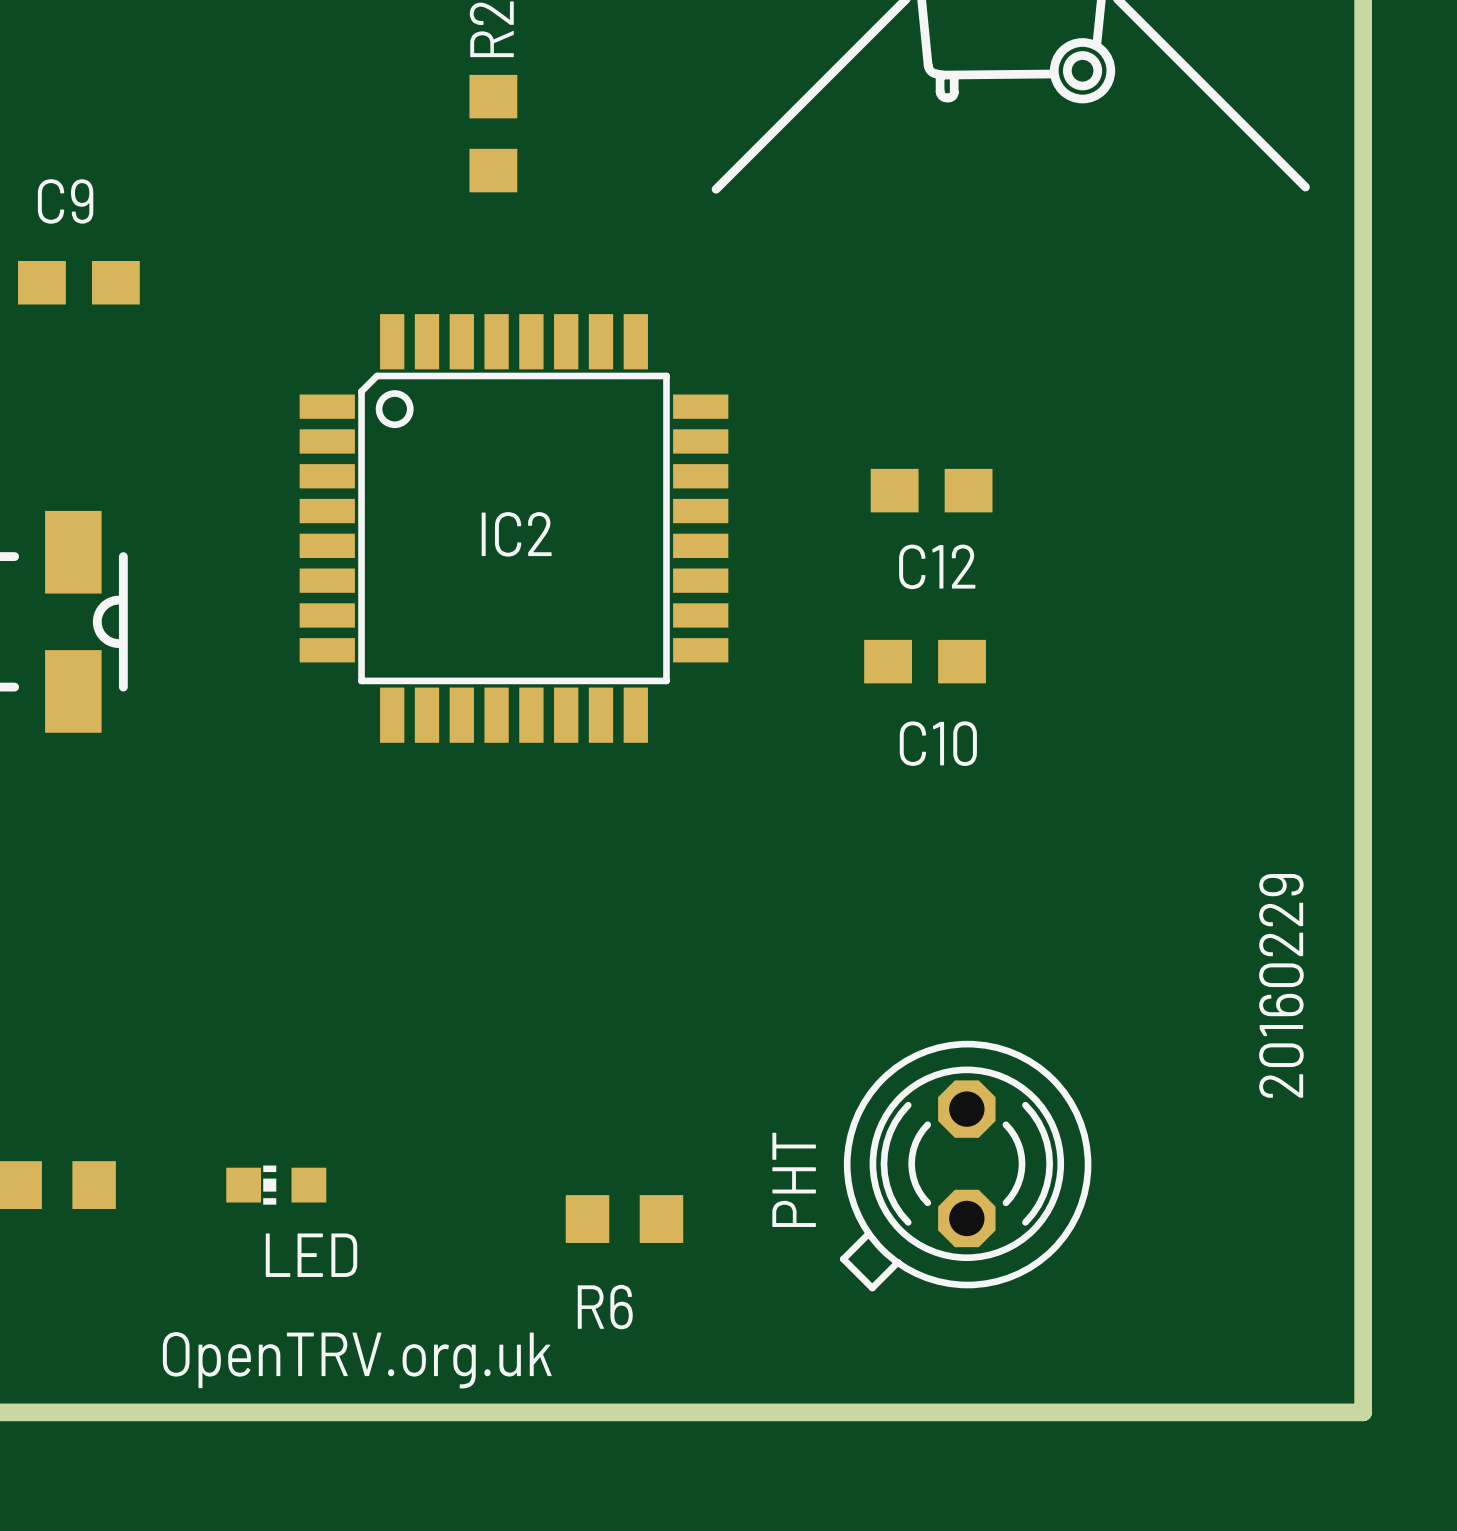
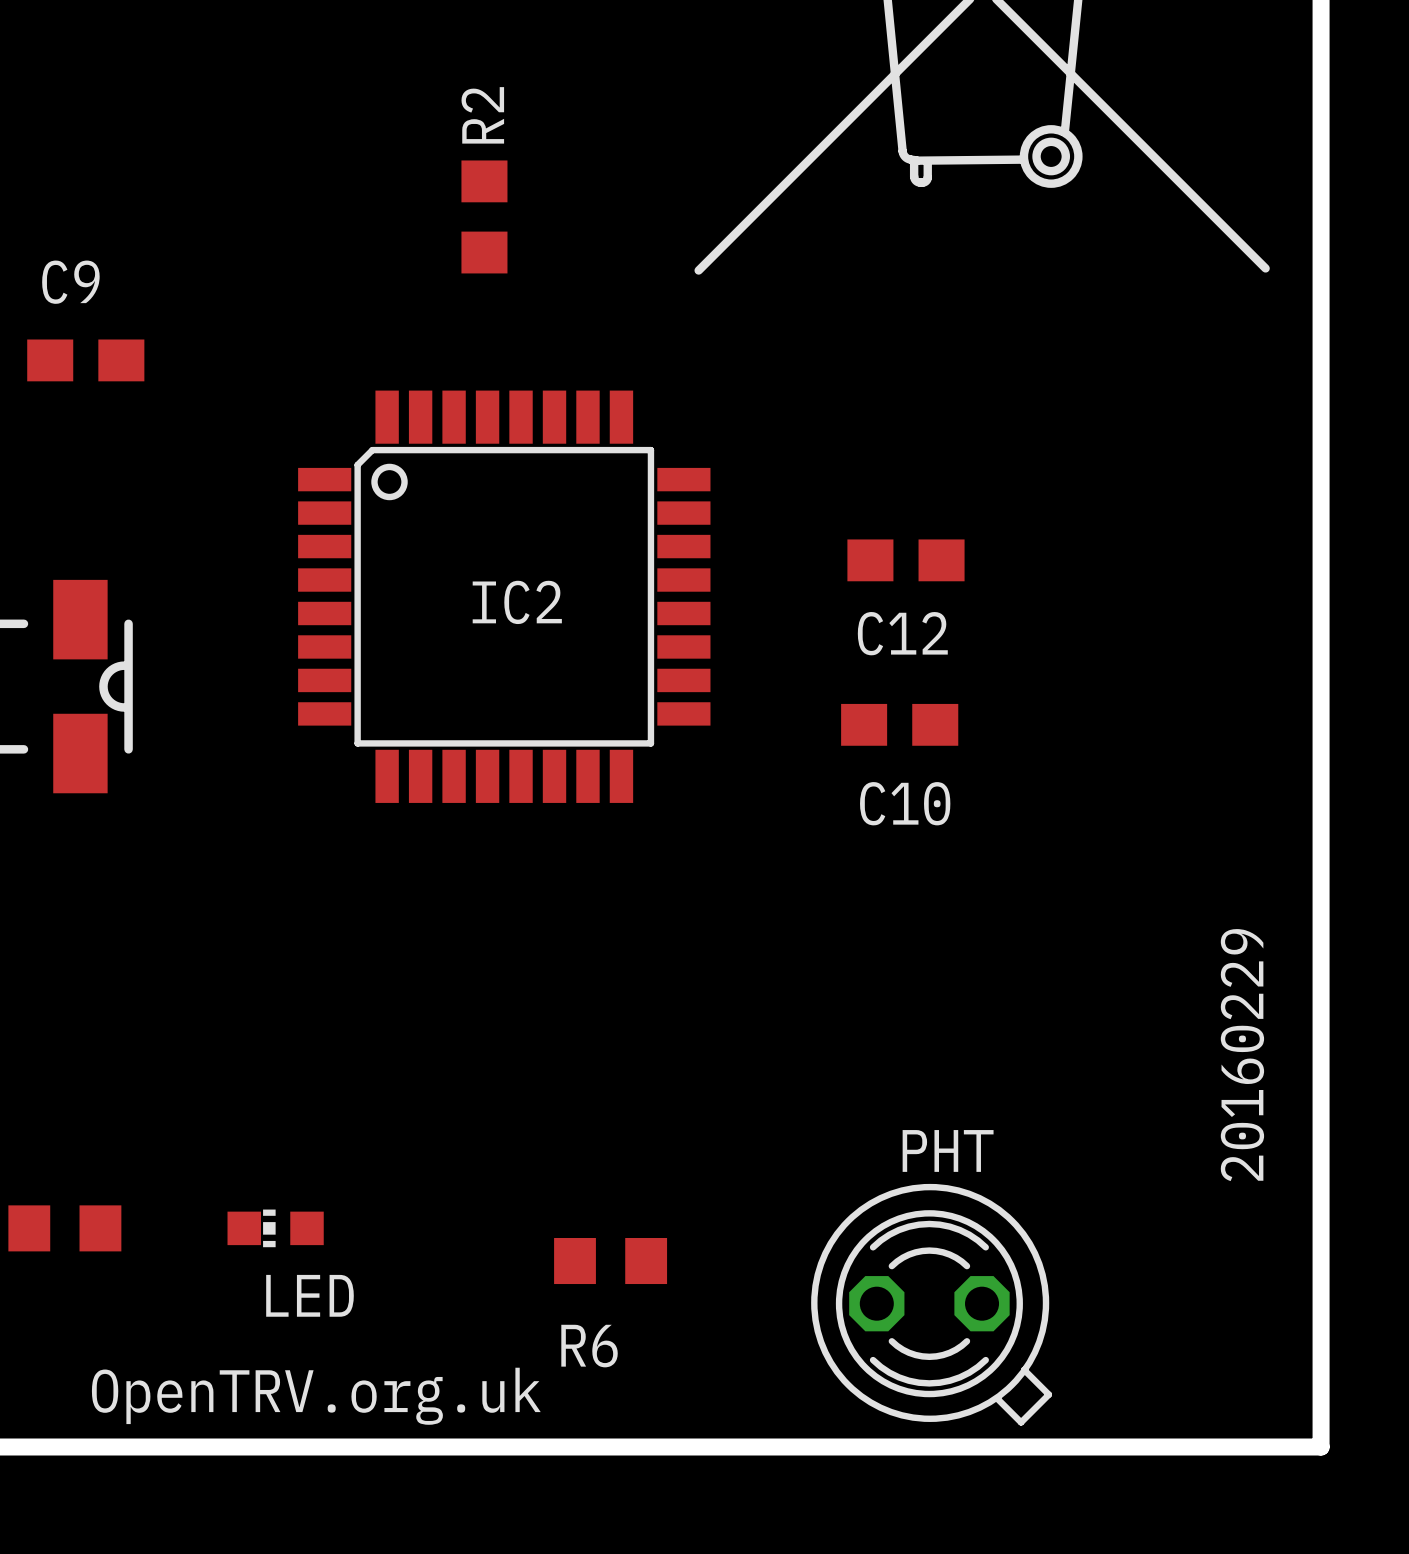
PHT rotation: 0° (965, 1166) -> 90° counterclockwise (931, 1304)
PHT name position: PHT (794, 1179) -> PHT (948, 1150)

